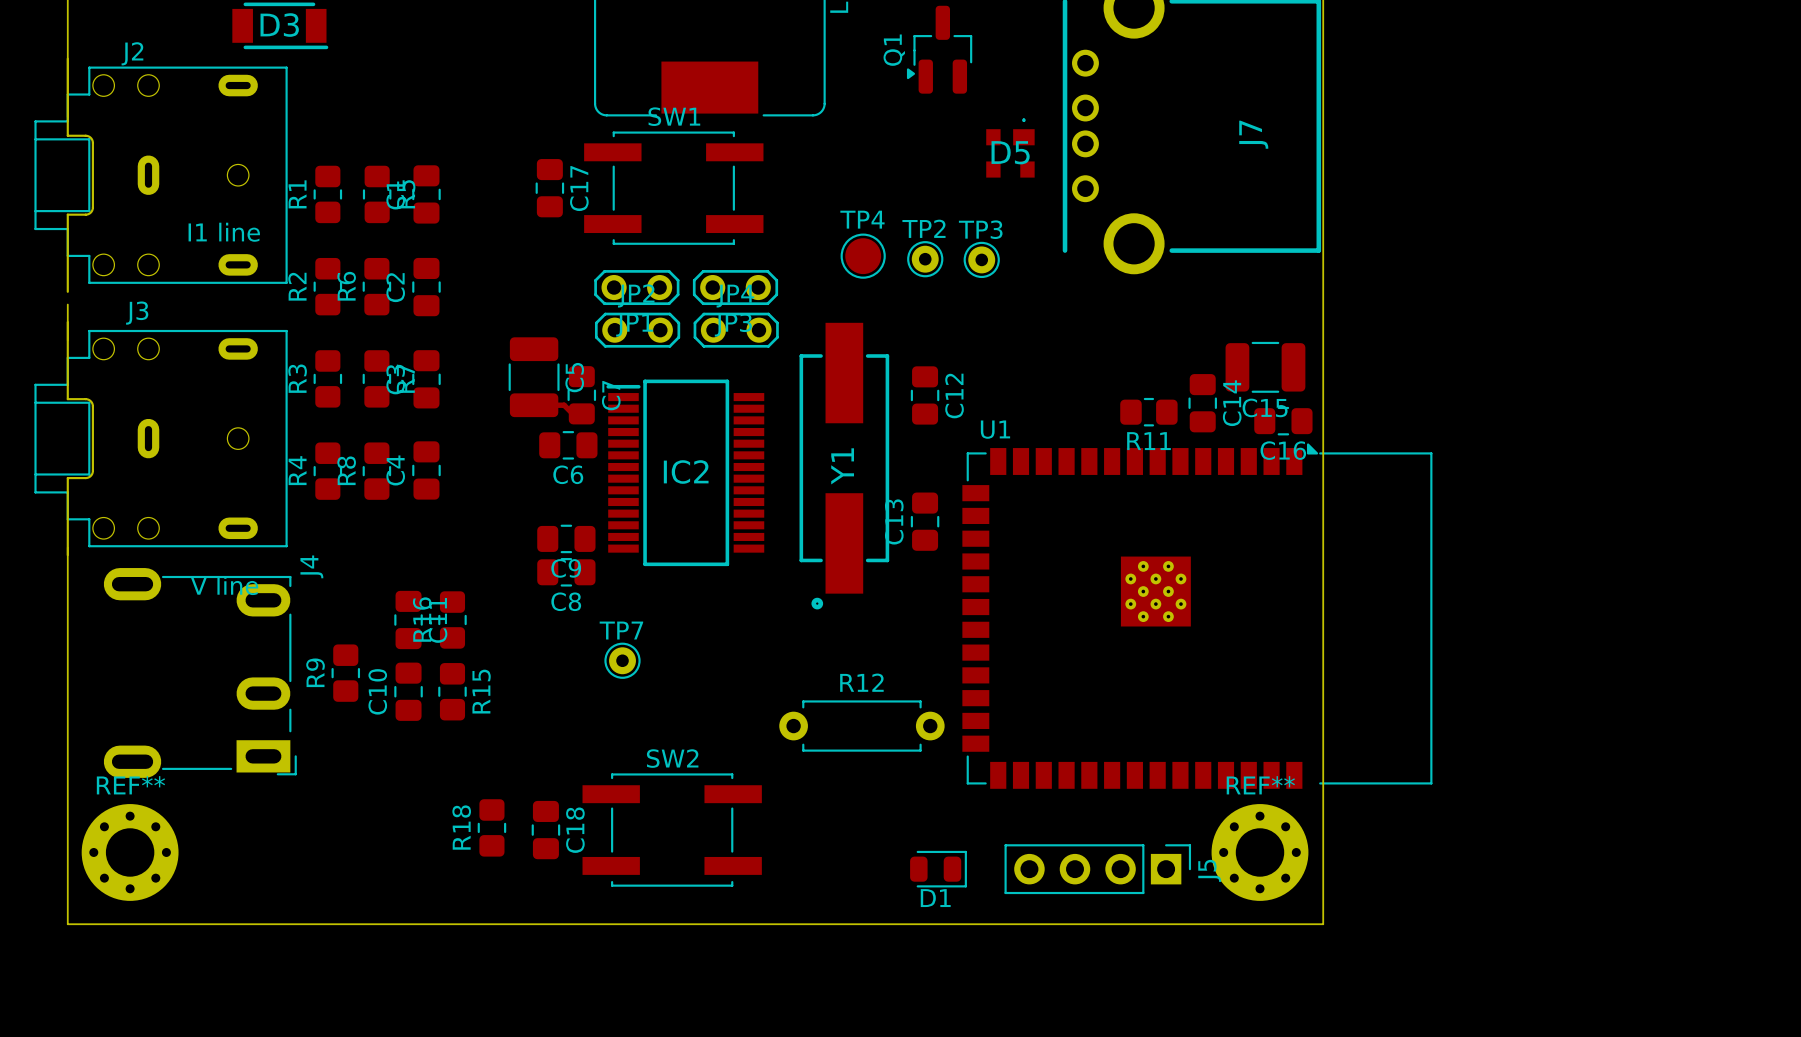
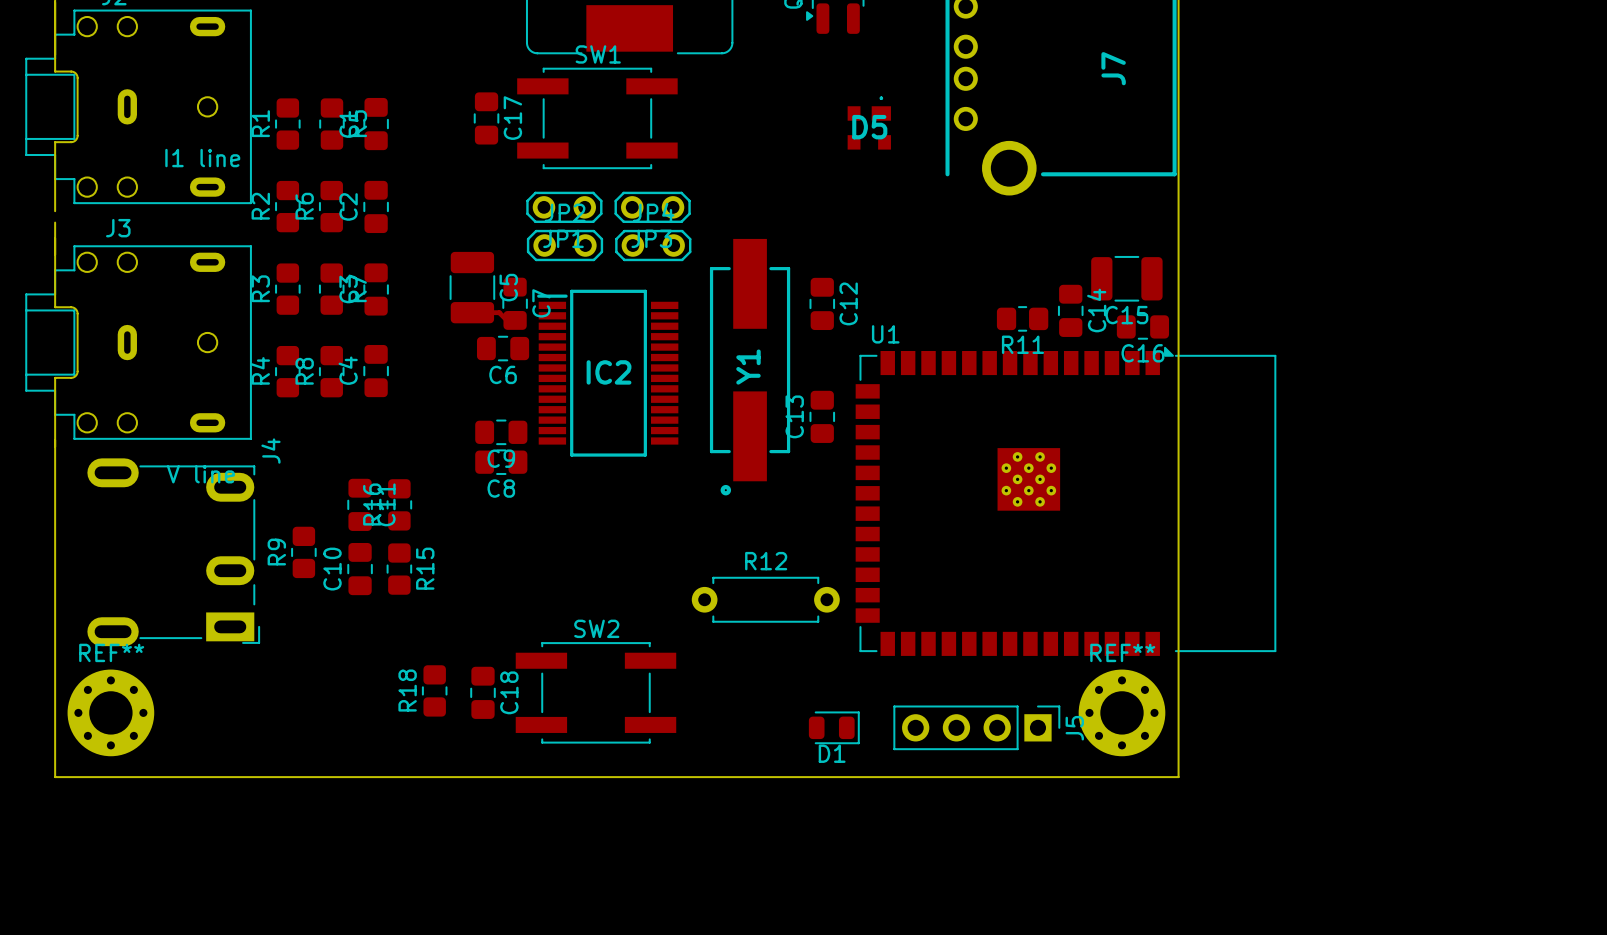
D5 position: (1010, 148) -> (869, 123)
TP4: (863, 256) -> none
TP2: (925, 259) -> none
TP3: (981, 259) -> none
TP7: (622, 660) -> none

